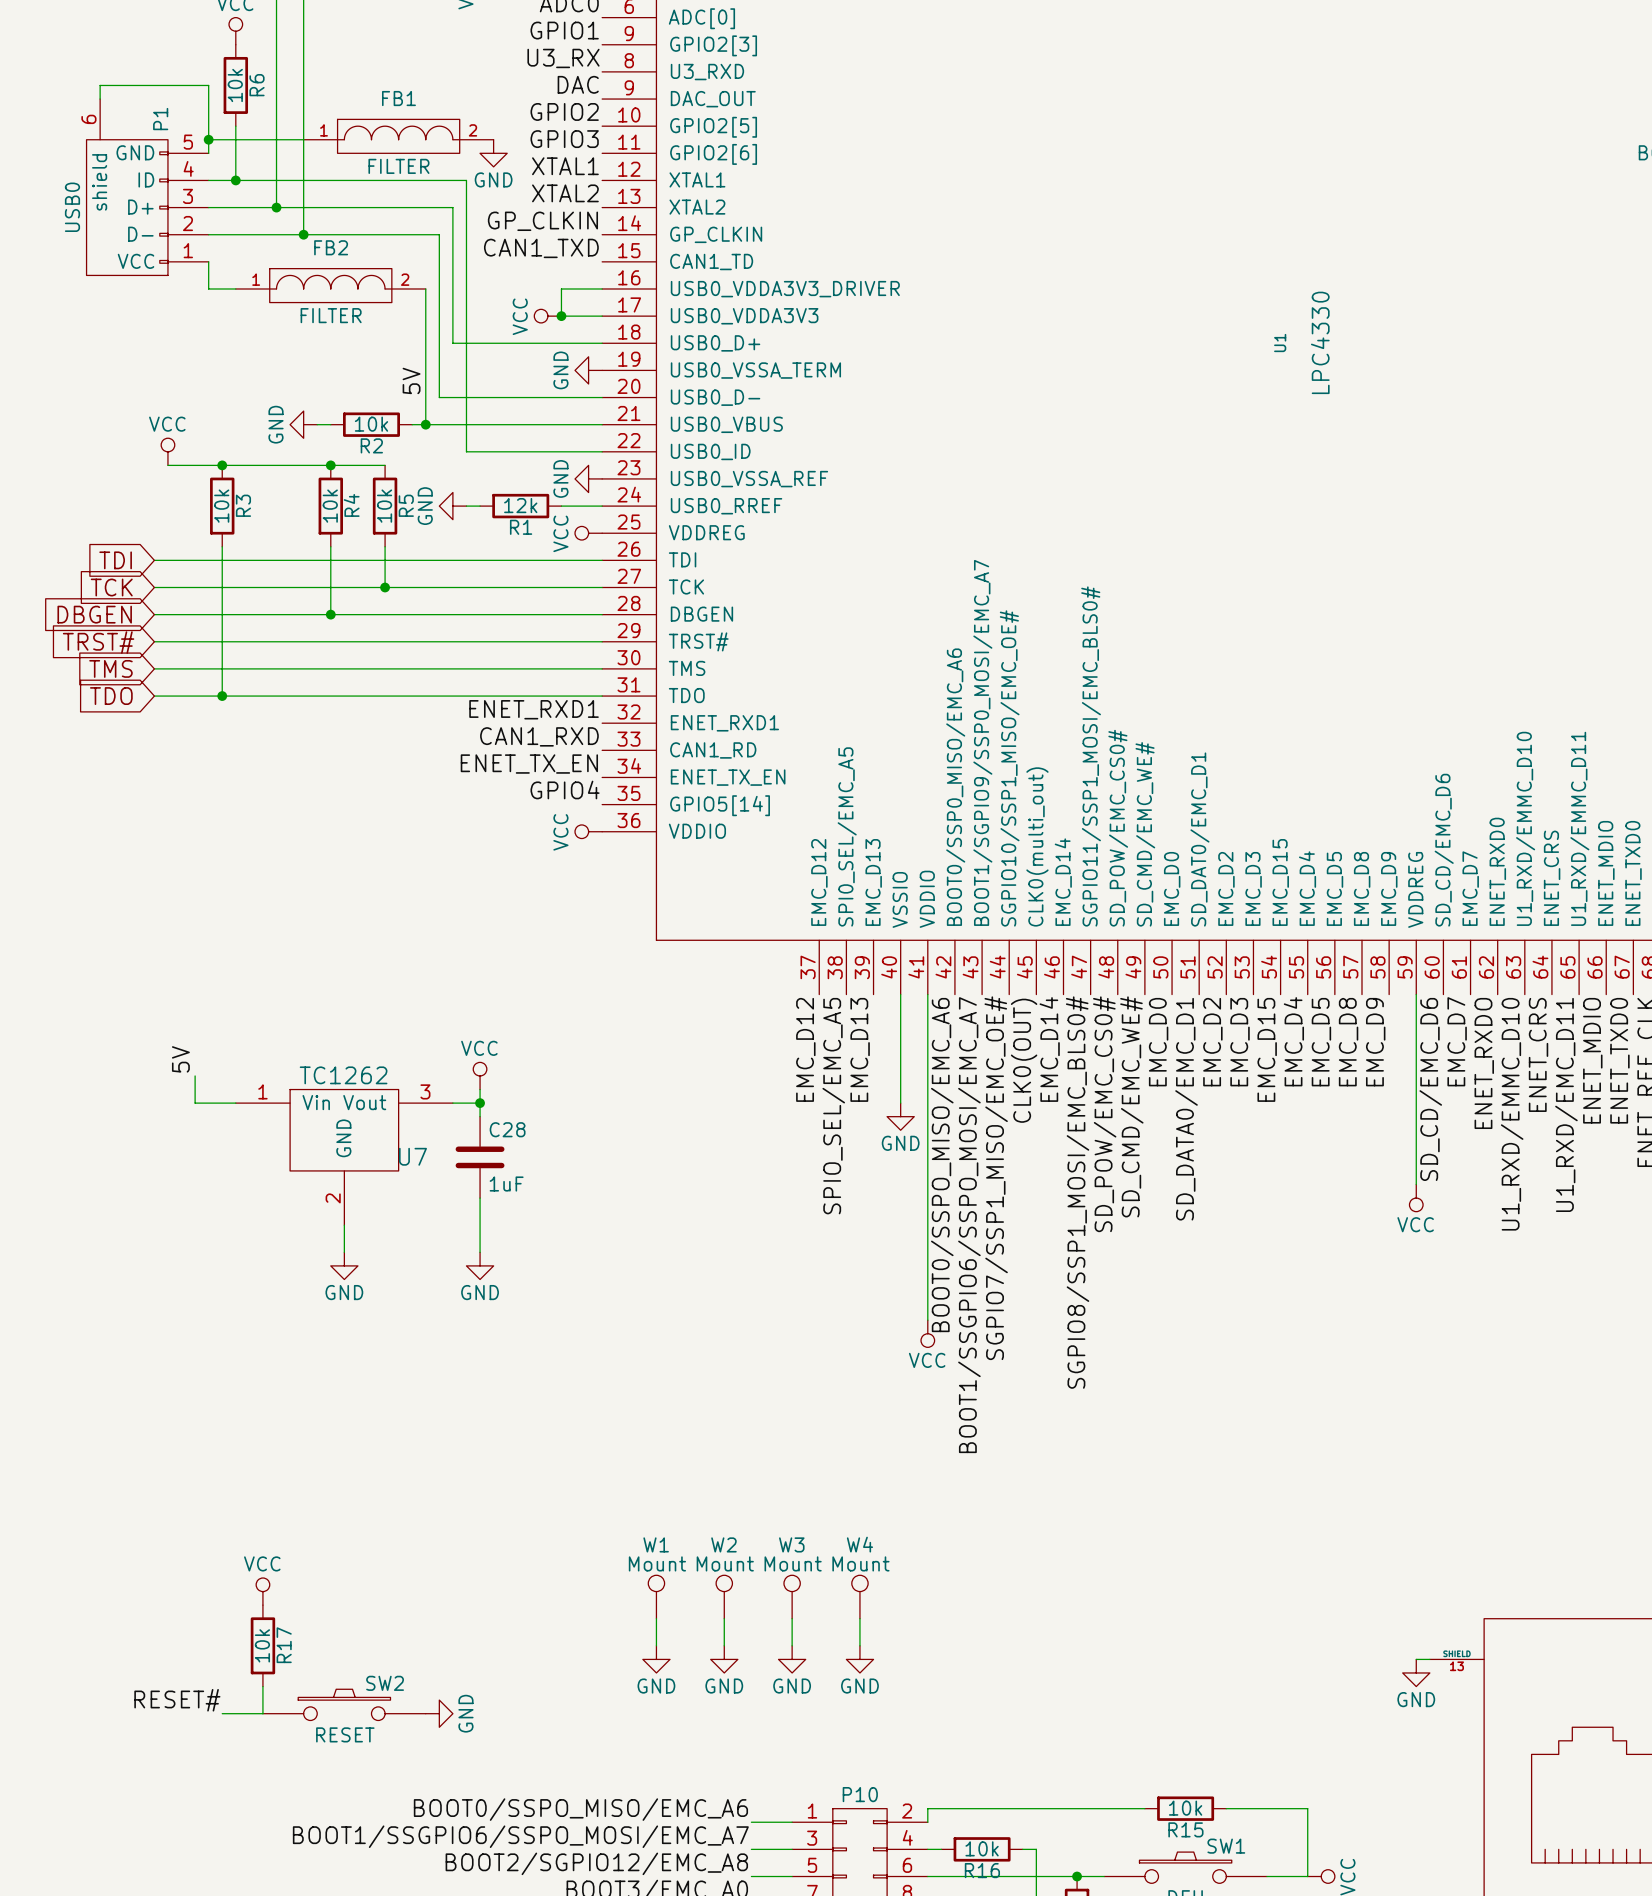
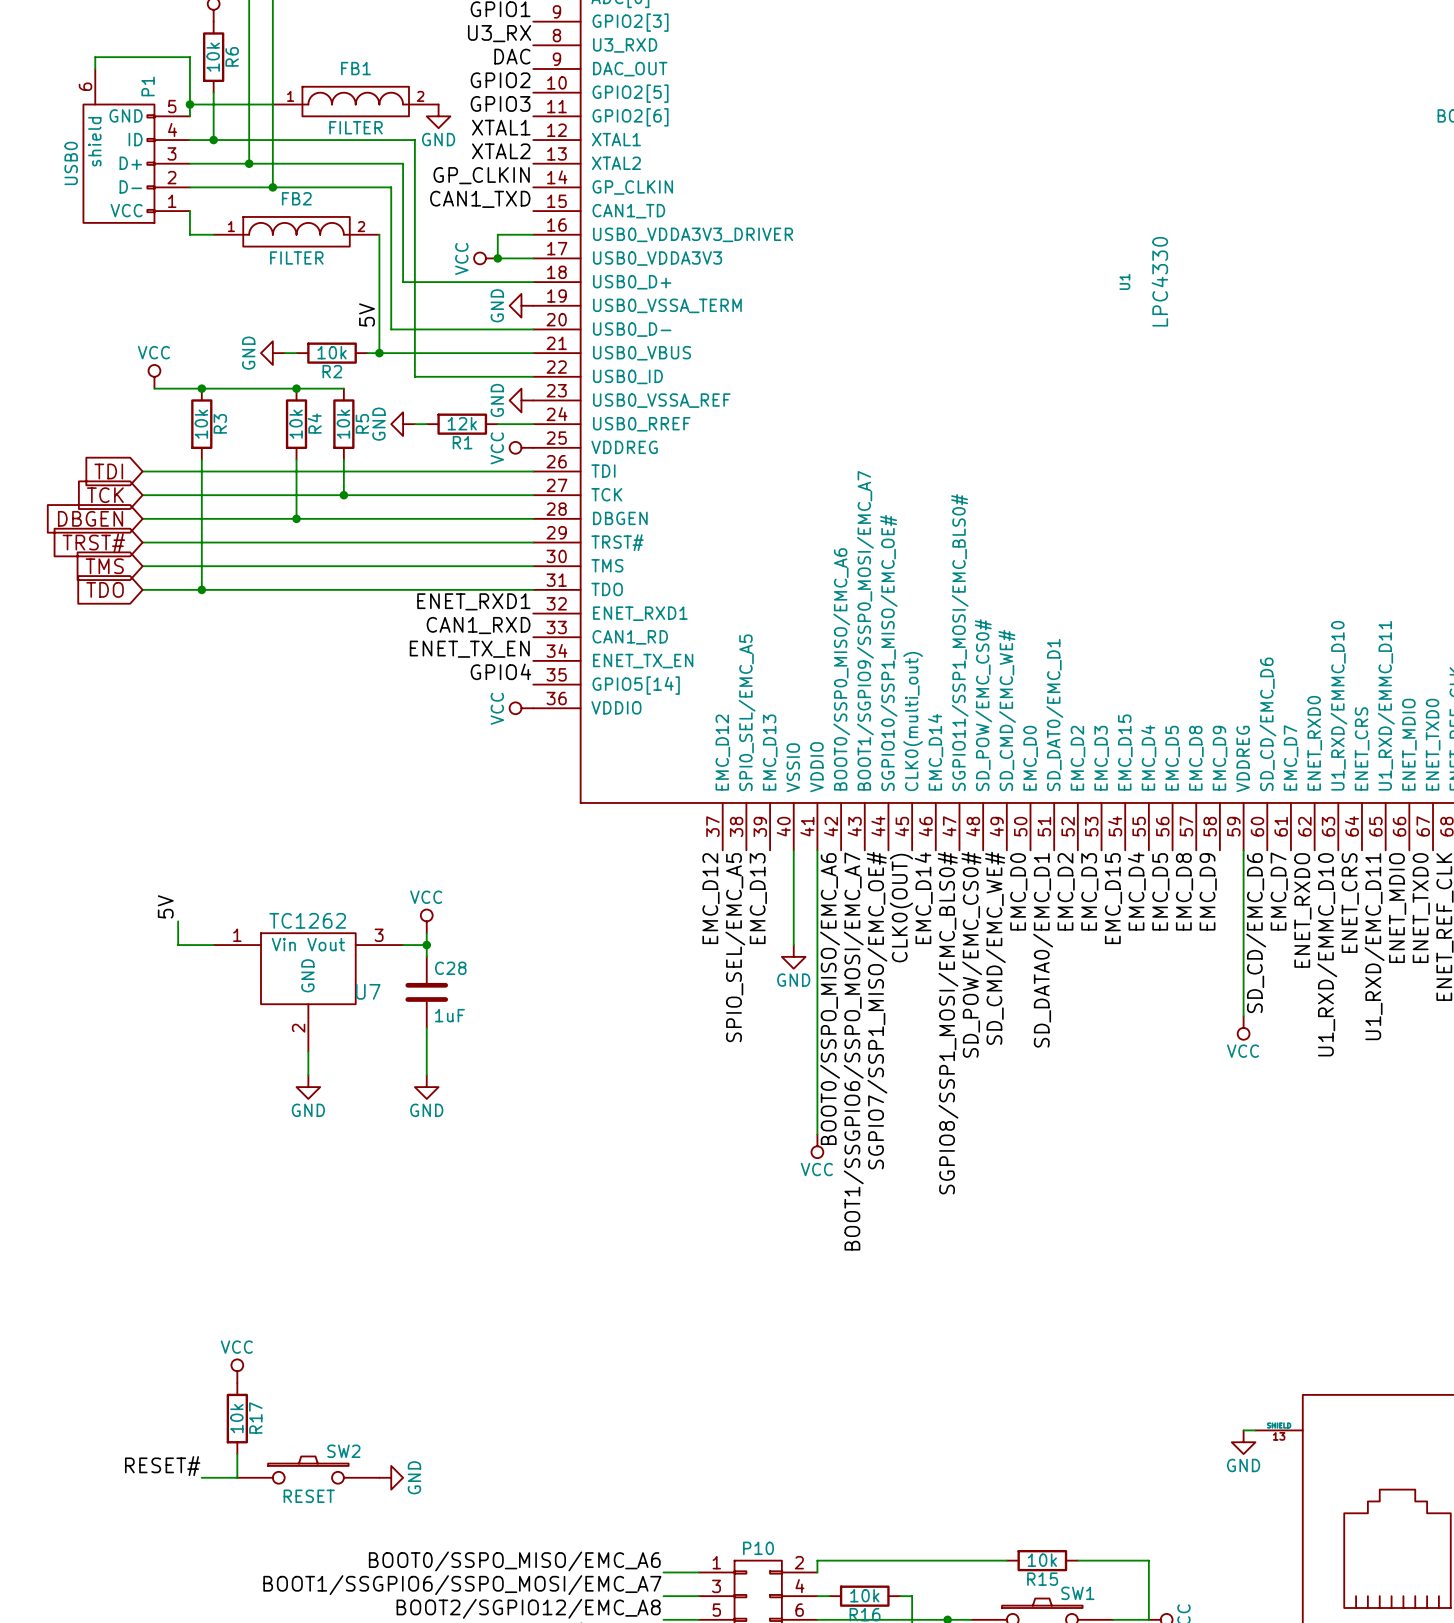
W1: Mount (656, 1597) -> none
W2: Mount (724, 1597) -> none
W3: Mount (792, 1597) -> none
W4: Mount (859, 1597) -> none
wire: (656, 1618) (656, 1645) -> none
wire: (724, 1618) (724, 1645) -> none
wire: (792, 1618) (792, 1645) -> none
wire: (859, 1618) (859, 1645) -> none
power symbol: GND (656, 1659) -> none
power symbol: GND (724, 1659) -> none
power symbol: GND (792, 1659) -> none
power symbol: GND (859, 1659) -> none

